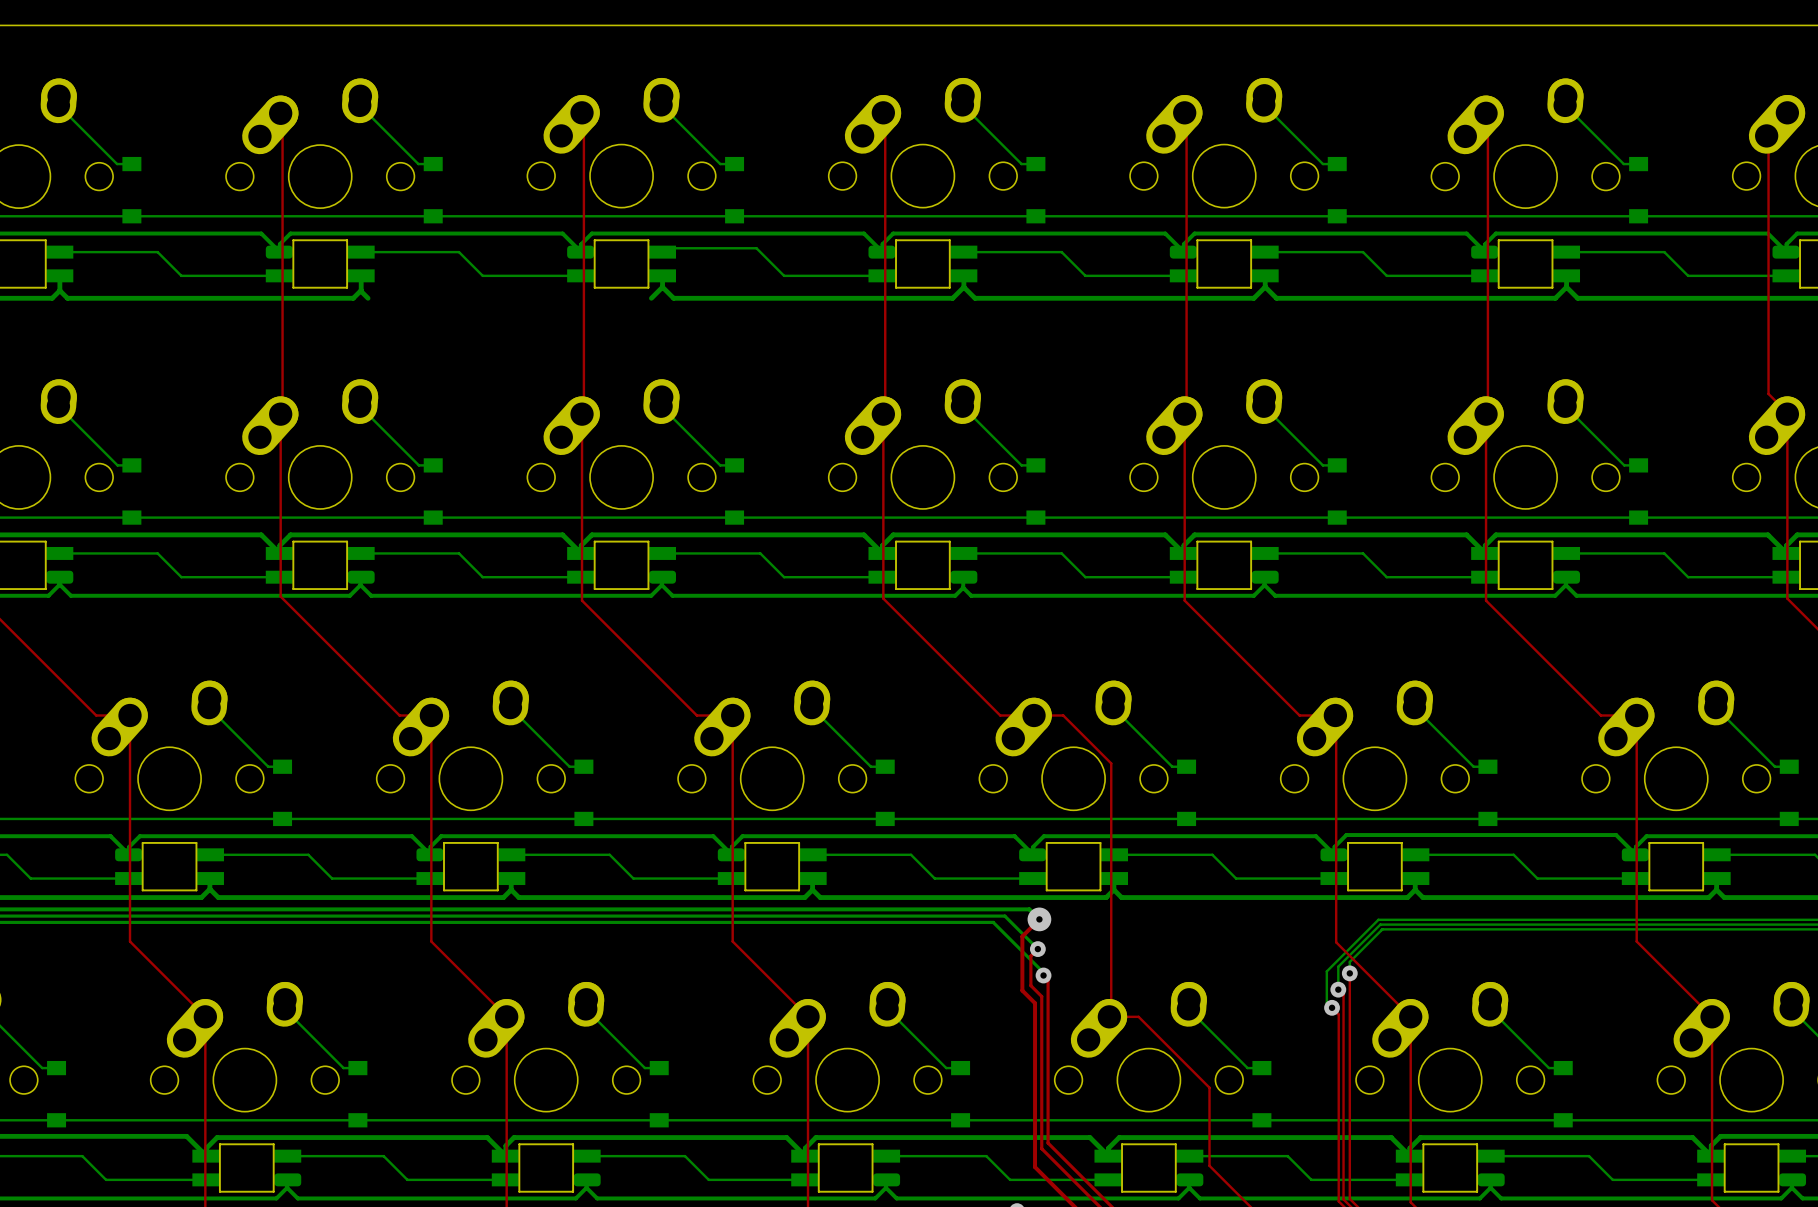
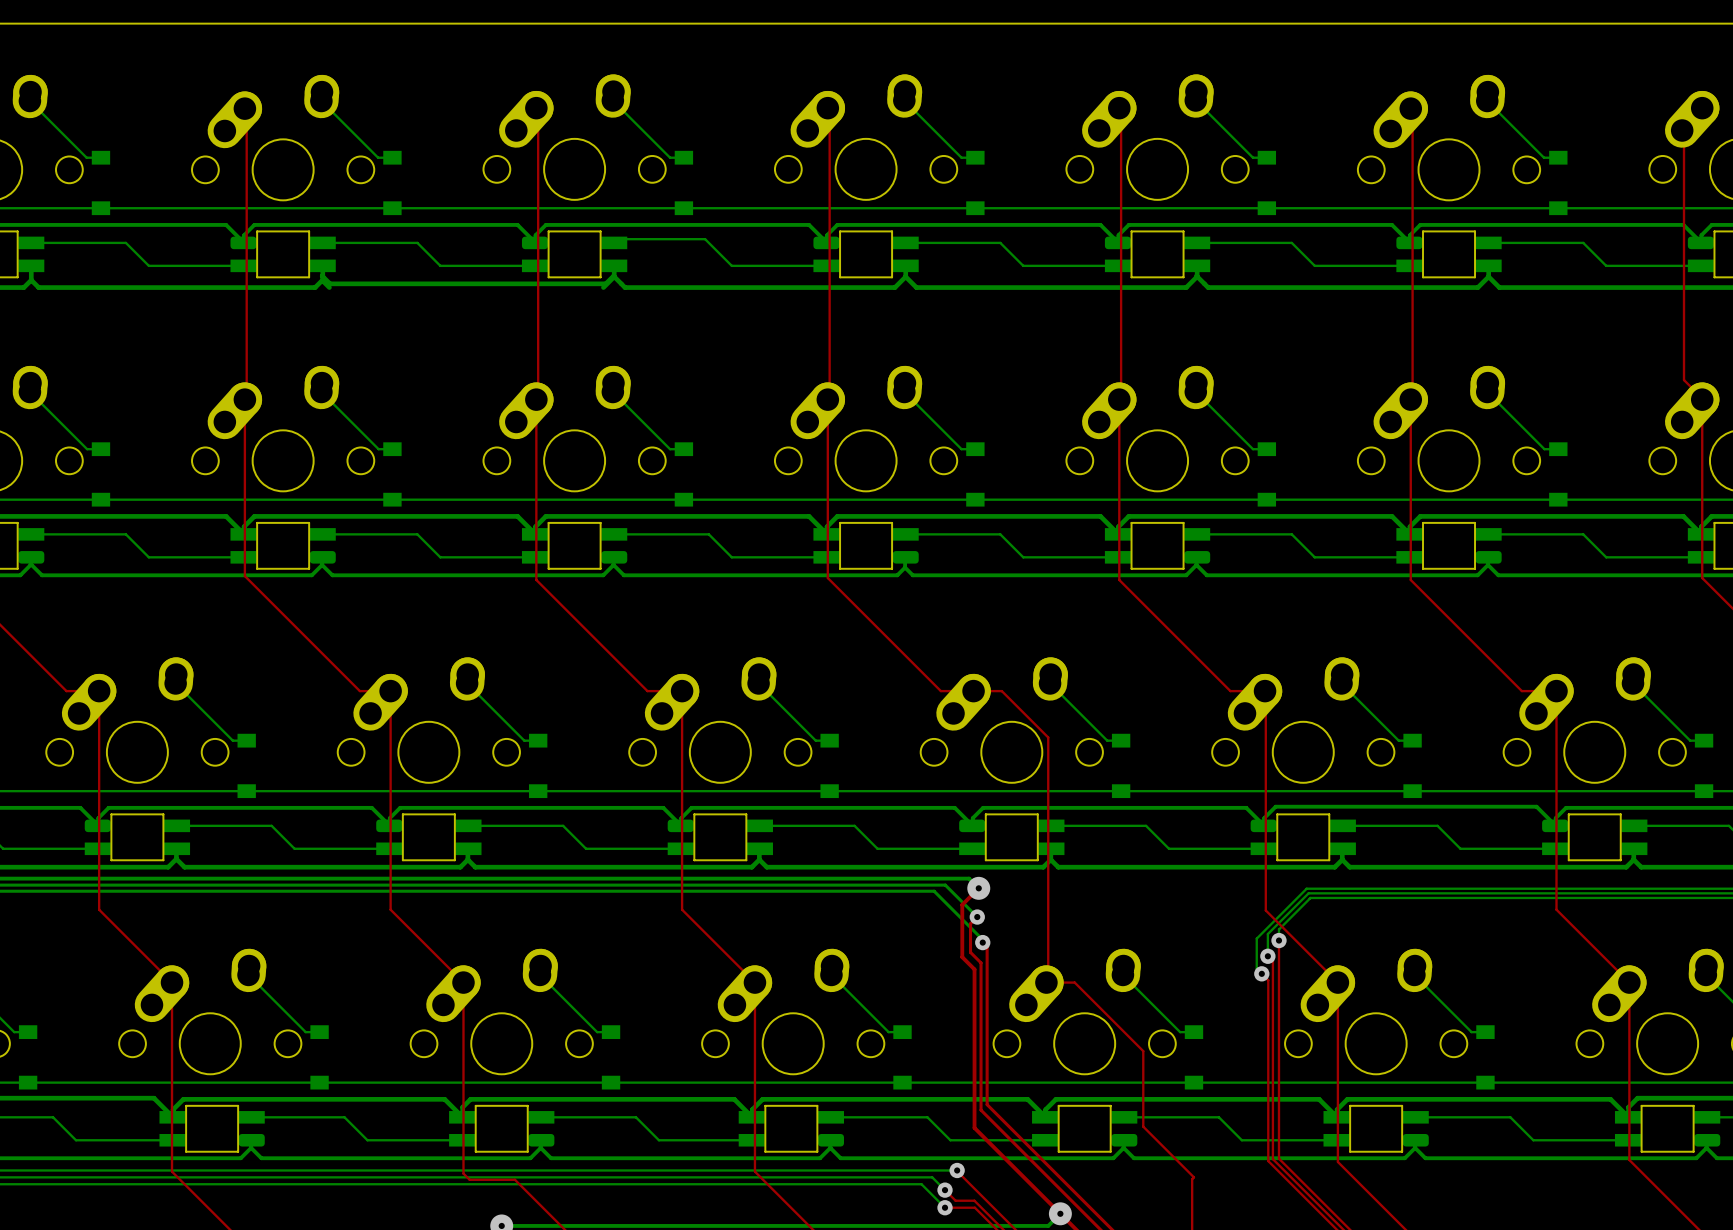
bottom track: none -> (322, 275) (330, 283) (605, 283) (614, 276)

